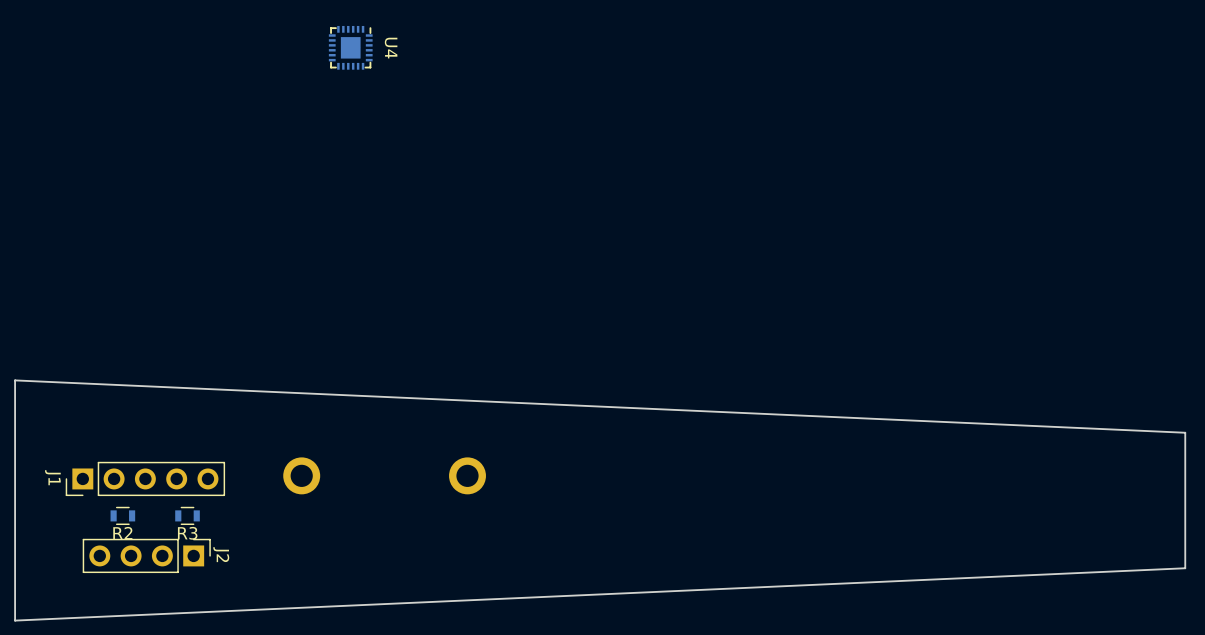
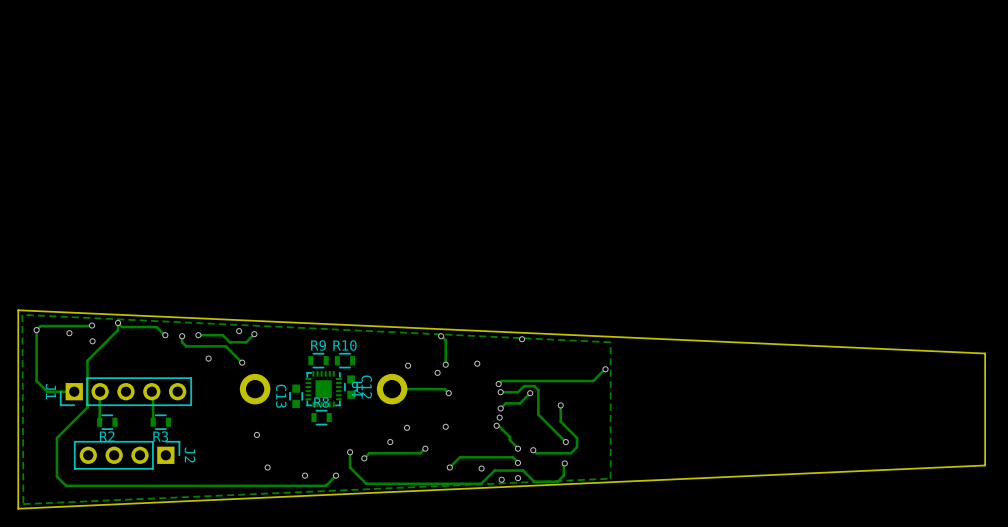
U4 position: (350, 47) -> (323, 389)
zone outline: none -> (22, 314) (610, 342) (610, 478) (23, 504) (22, 314)
via: none -> (118, 322)
track: none -> (92, 325) (40, 326) (36, 330) (36, 380) (47, 391) (74, 391)
via: none -> (92, 325)
via: none -> (36, 330)
via: none -> (239, 331)
via: none -> (69, 333)
track: none -> (254, 334) (246, 342) (229, 342) (222, 335) (198, 335)
via: none -> (254, 334)
track: none -> (165, 335) (156, 327) (122, 327) (118, 322) (118, 330) (87, 360) (87, 407) (56, 437) (56, 476) (66, 485) (325, 485) (336, 475)
via: none -> (165, 335)
via: none -> (198, 335)
track: none -> (182, 336) (182, 342) (186, 346) (225, 346) (242, 362)
via: none -> (182, 336)
track: none -> (441, 336) (445, 340) (445, 364)
via: none -> (441, 336)
via: none -> (522, 339)
via: none -> (92, 341)
via: none -> (208, 358)
R9: none -> (318, 360)
R10: none -> (344, 360)
via: none -> (242, 362)
via: none -> (477, 363)
via: none -> (445, 364)
via: none -> (408, 365)
track: none -> (605, 369) (593, 380) (501, 380) (498, 384)
via: none -> (605, 369)
via: none -> (437, 372)
via: none -> (498, 384)
C12: none -> (351, 387)
track: none -> (392, 389) (444, 389) (448, 393)
track: none -> (100, 391) (99, 422)
track: none -> (151, 391) (153, 422)
track: none -> (500, 392) (517, 392) (524, 386) (534, 386) (538, 390) (538, 414) (565, 442)
via: none -> (500, 392)
via: none -> (448, 393)
track: none -> (530, 393) (520, 403) (505, 403) (500, 408)
via: none -> (530, 393)
C13: none -> (296, 396)
track: none -> (560, 405) (560, 421) (577, 437) (577, 447) (570, 453) (536, 453) (533, 450)
via: none -> (560, 405)
via: none -> (500, 408)
R8: none -> (321, 417)
via: none -> (499, 417)
track: none -> (496, 425) (509, 436) (509, 440) (517, 448)
via: none -> (496, 425)
via: none -> (445, 426)
via: none -> (407, 427)
via: none -> (256, 434)
via: none -> (390, 442)
via: none -> (565, 442)
track: none -> (425, 448) (420, 453) (369, 453) (364, 458)
via: none -> (425, 448)
via: none -> (517, 448)
via: none -> (533, 450)
track: none -> (350, 452) (350, 467) (366, 483) (481, 483) (494, 470) (523, 470) (534, 481) (557, 481) (563, 475) (564, 463)
via: none -> (350, 452)
via: none -> (364, 458)
track: none -> (517, 462) (512, 457) (459, 457) (449, 467)
via: none -> (517, 462)
via: none -> (564, 463)
via: none -> (267, 467)
via: none -> (449, 467)
via: none -> (481, 468)
via: none -> (305, 475)
via: none -> (336, 475)
via: none -> (517, 478)
via: none -> (501, 479)

